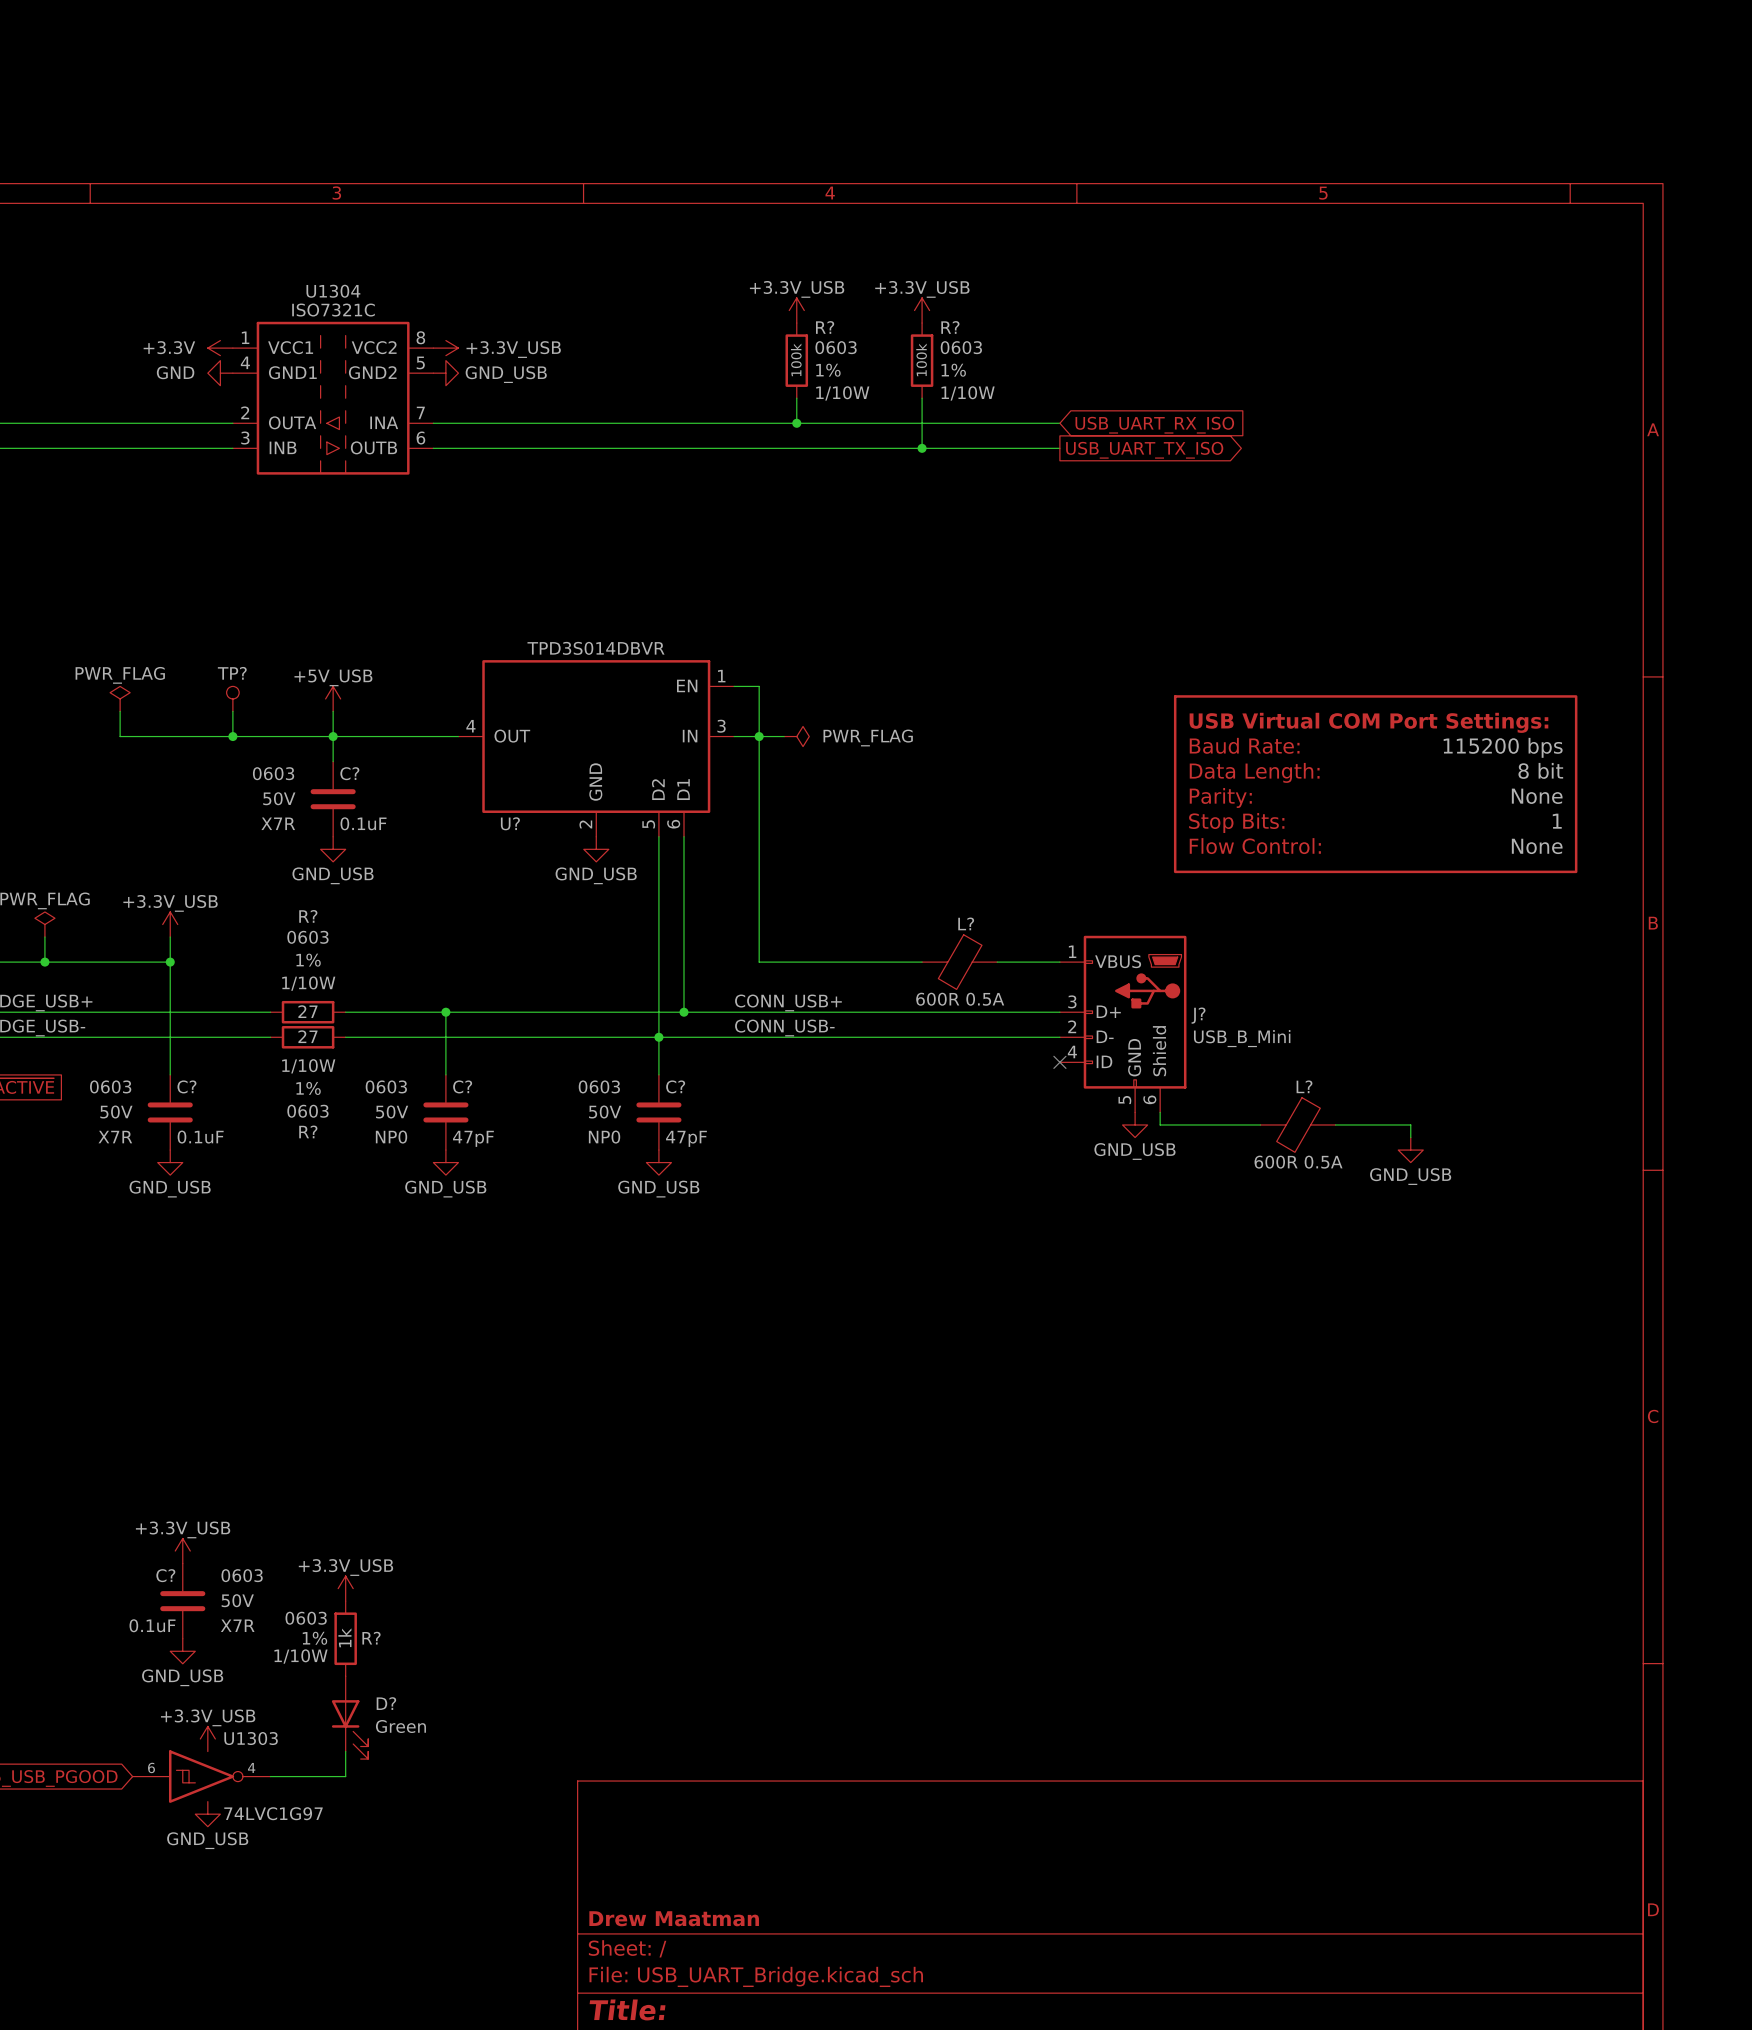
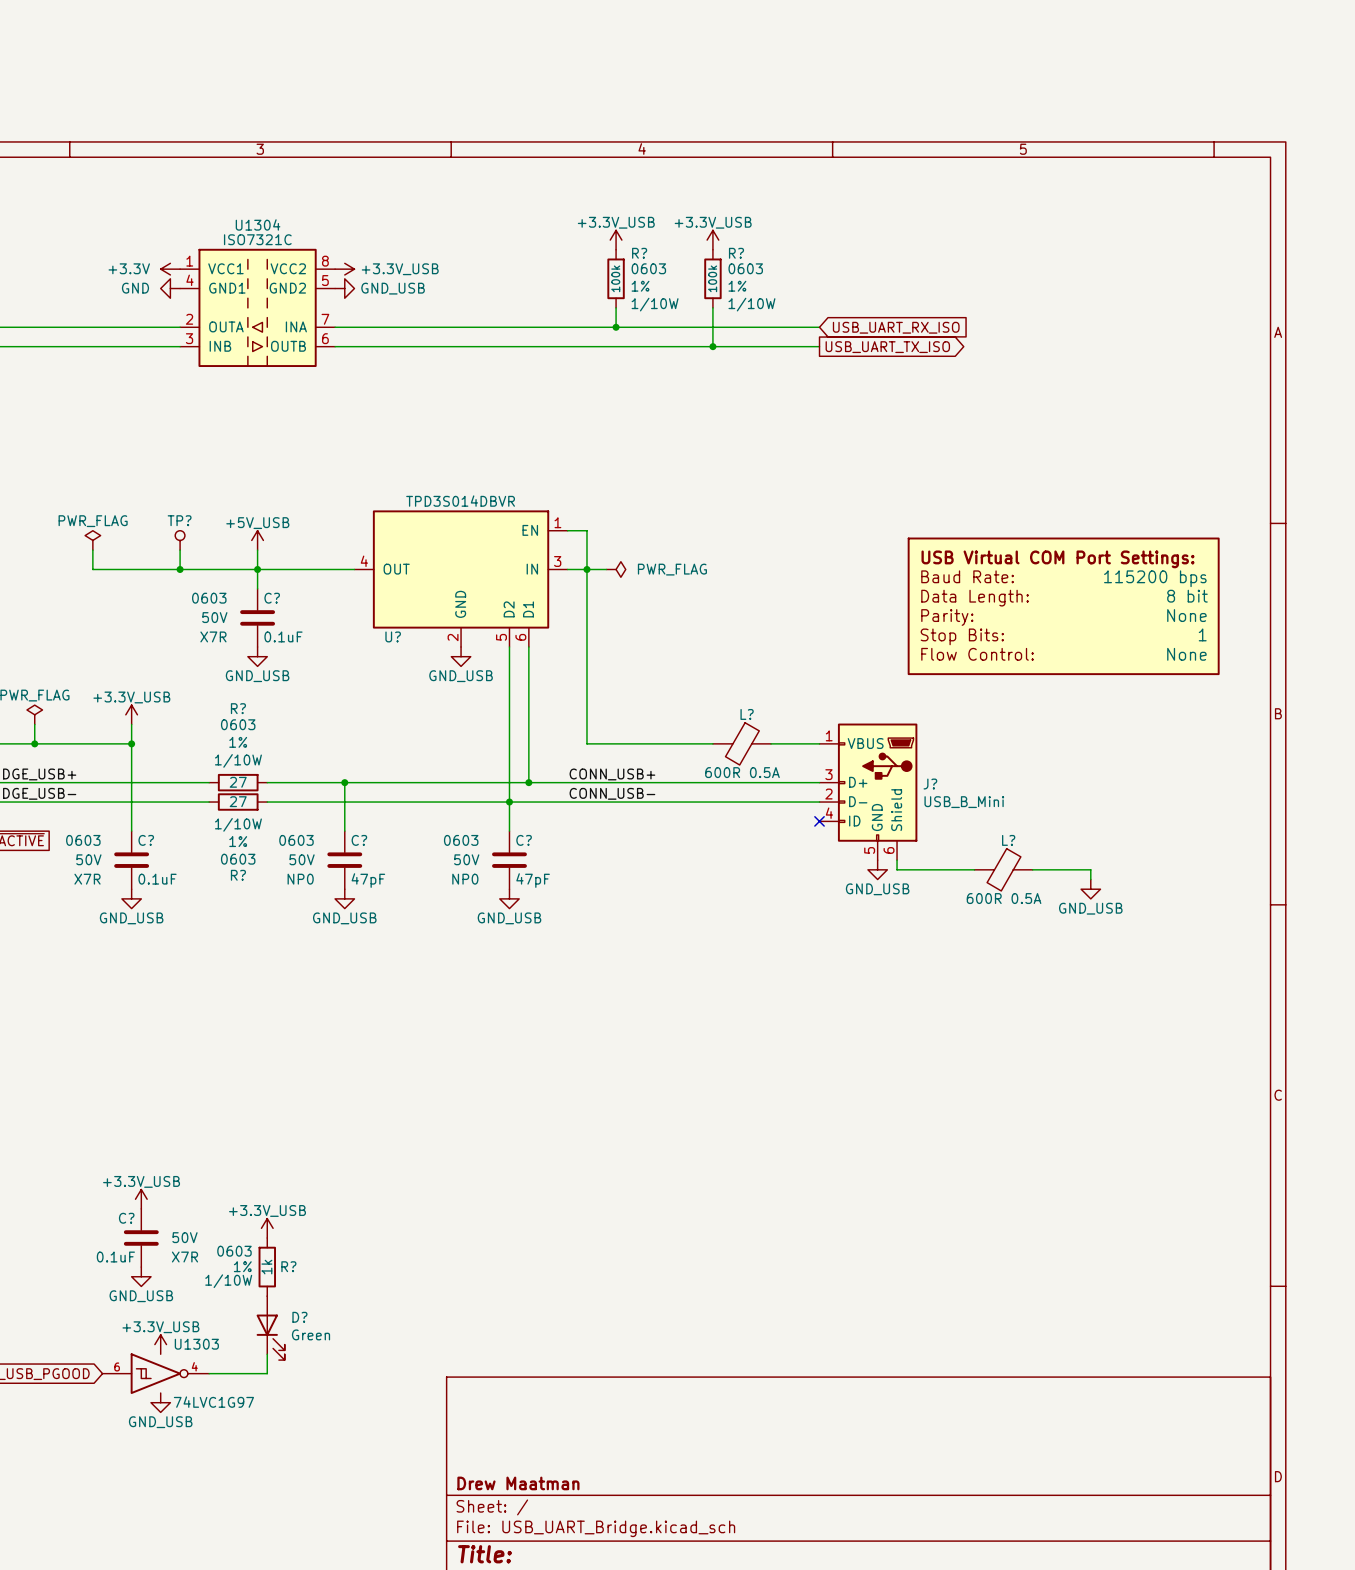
C? text: 0603 (242, 1575) -> none

